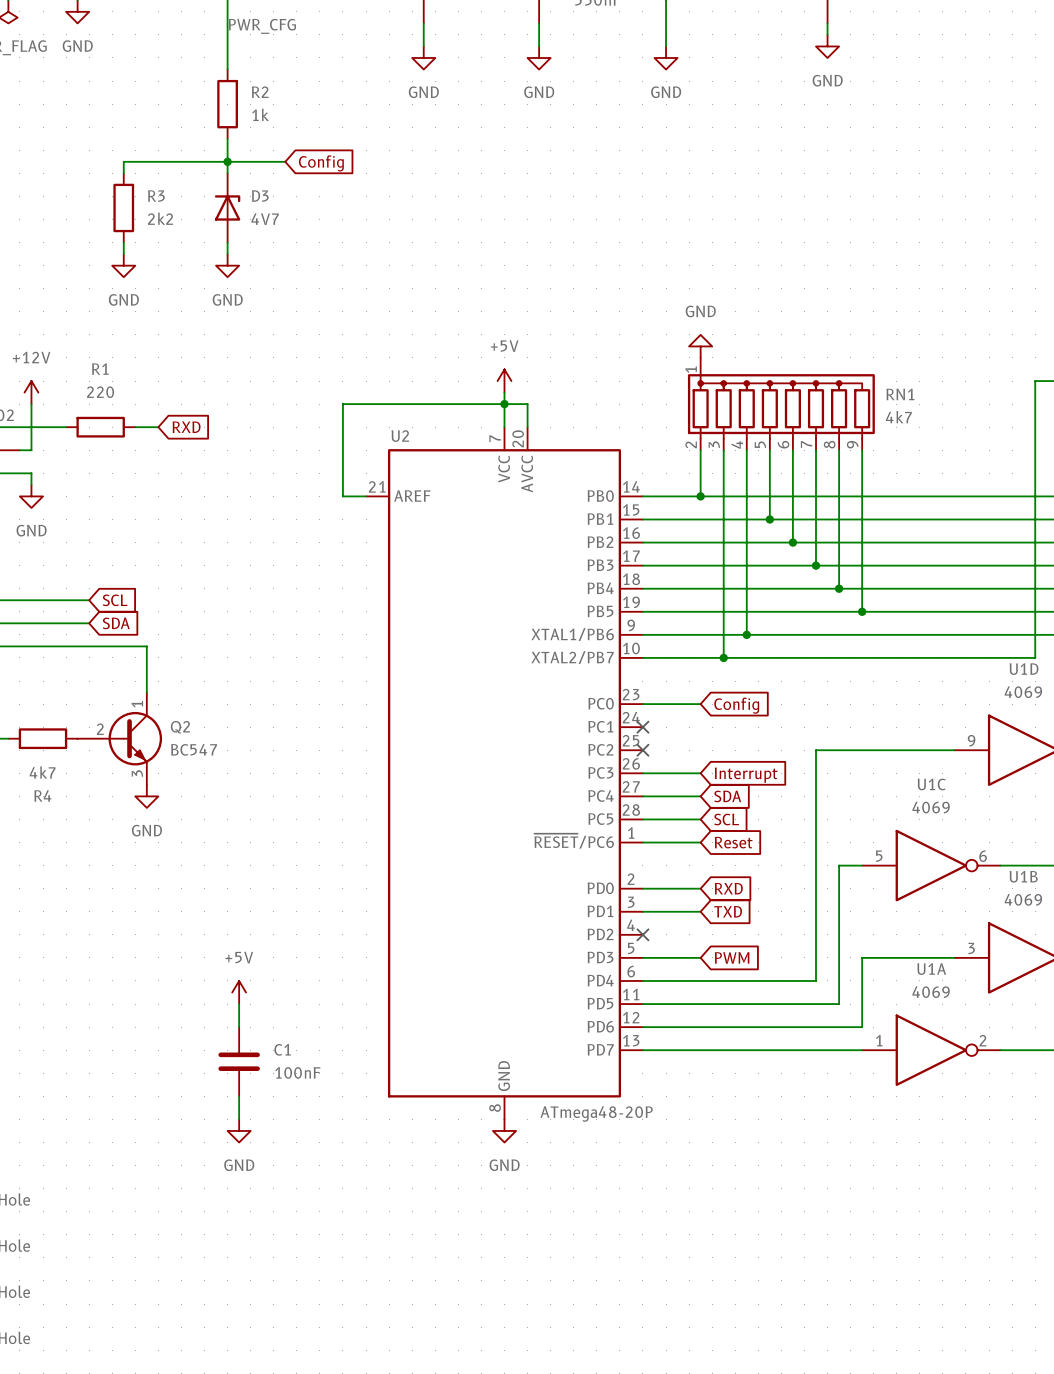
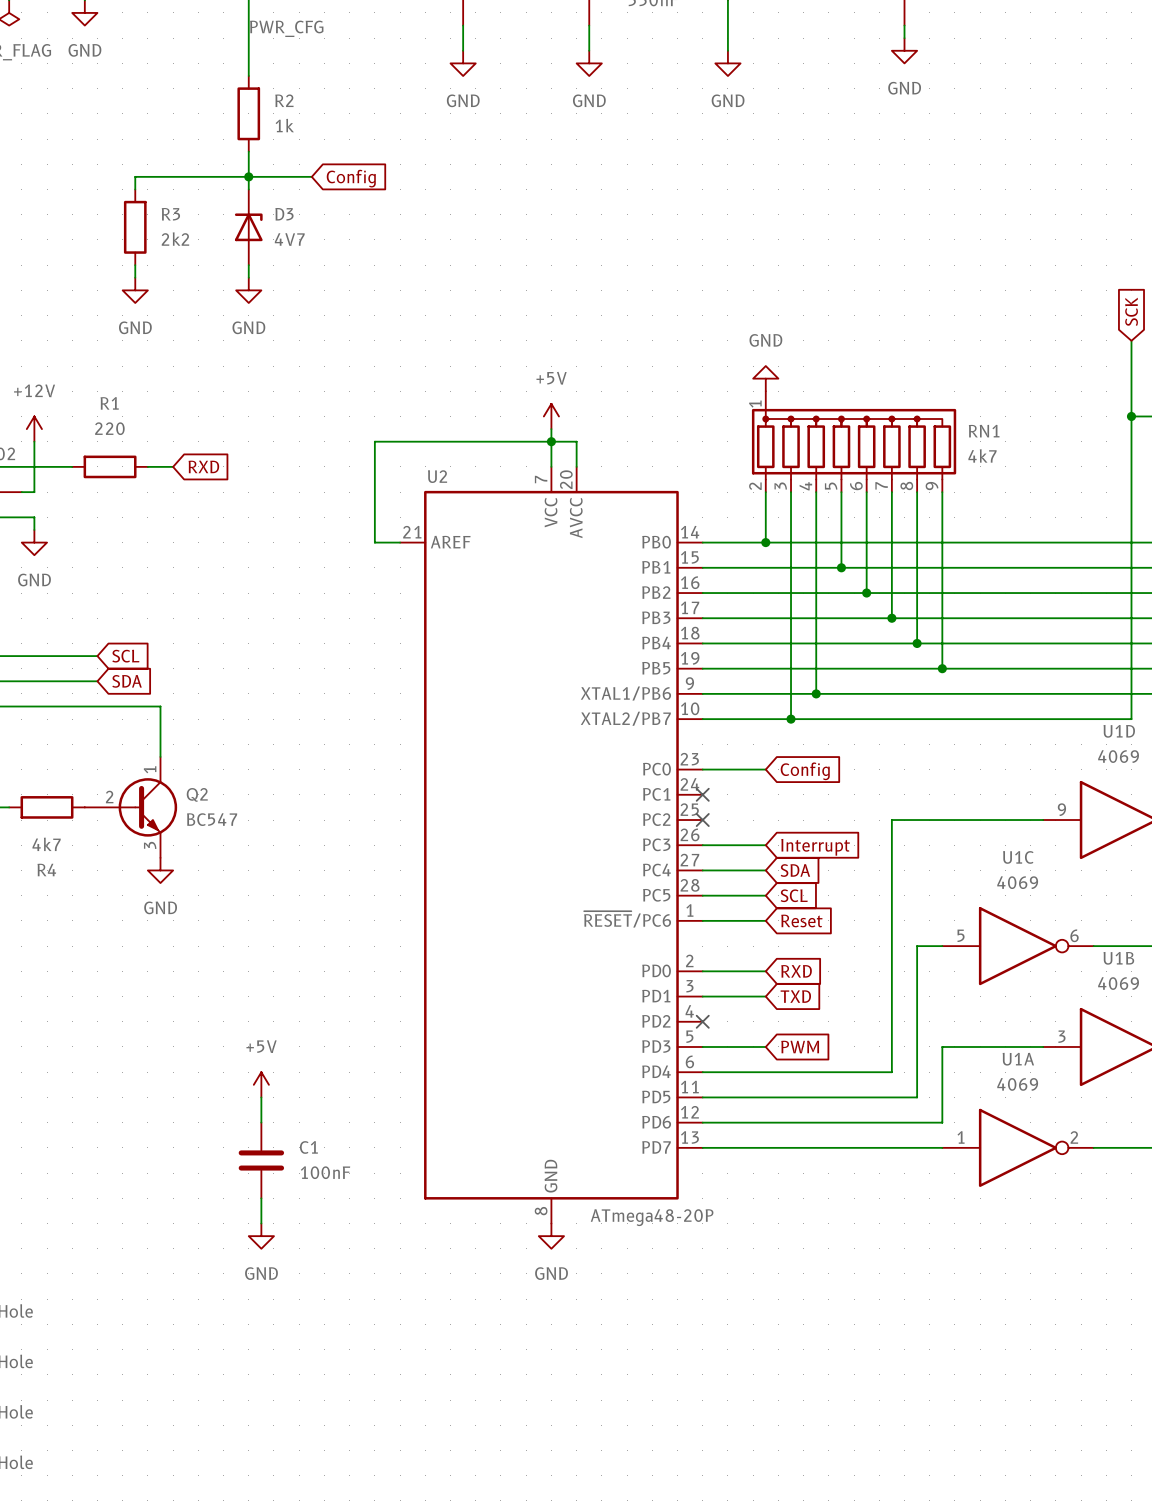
global label: none -> SCK (1131, 311)
wire: none -> (1131, 340) (1131, 416)
junction: none -> (1131, 416)

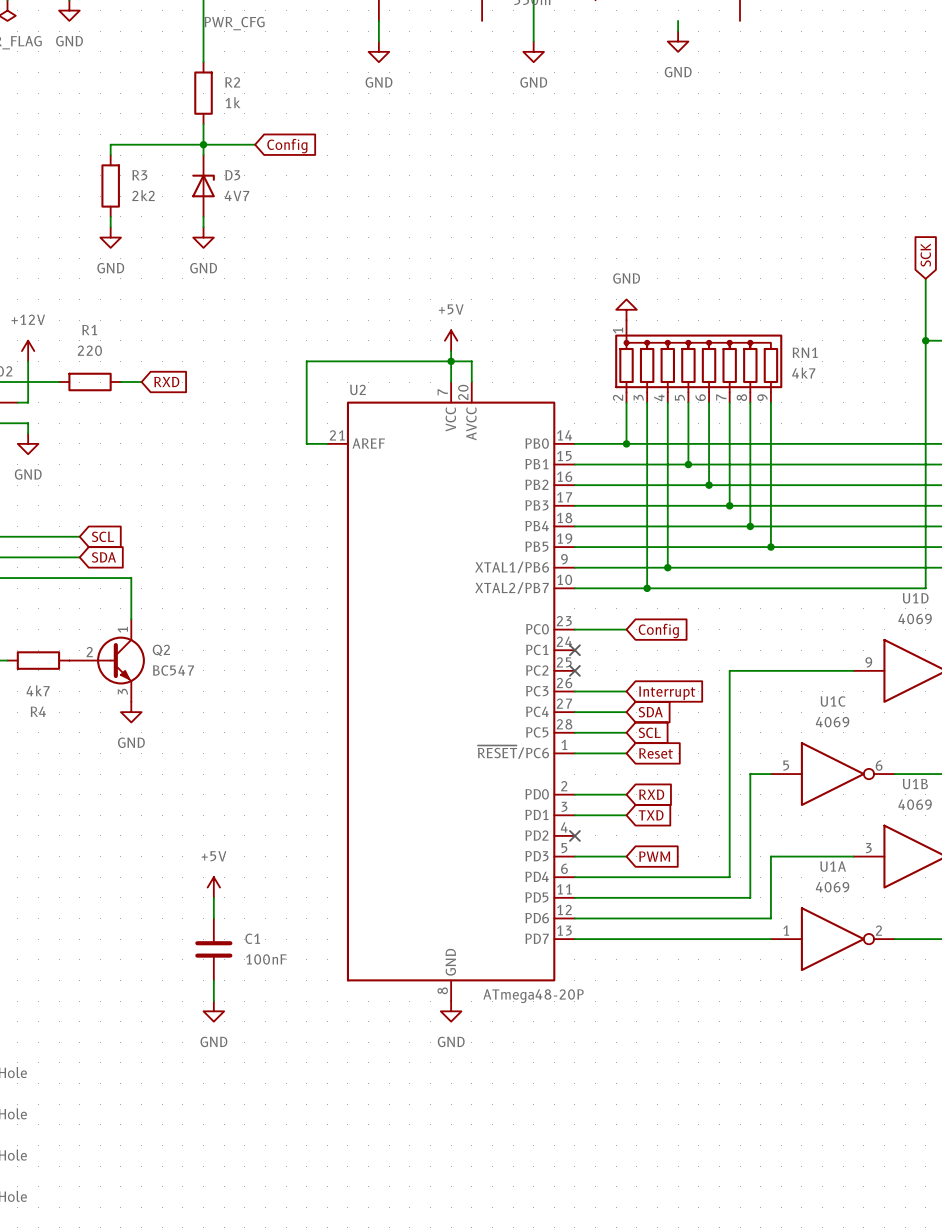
wire: (727, 0) (727, 50) -> (533, 0) (533, 41)
wire: (589, 25) (589, 50) -> none
wire: (904, 25) (904, 38) -> (678, 20) (678, 31)
power symbol: none -> GND (678, 41)
power symbol: GND (904, 50) -> none
power symbol: GND (589, 63) -> none
power symbol: none -> GND (533, 51)
power symbol: GND (727, 63) -> none

